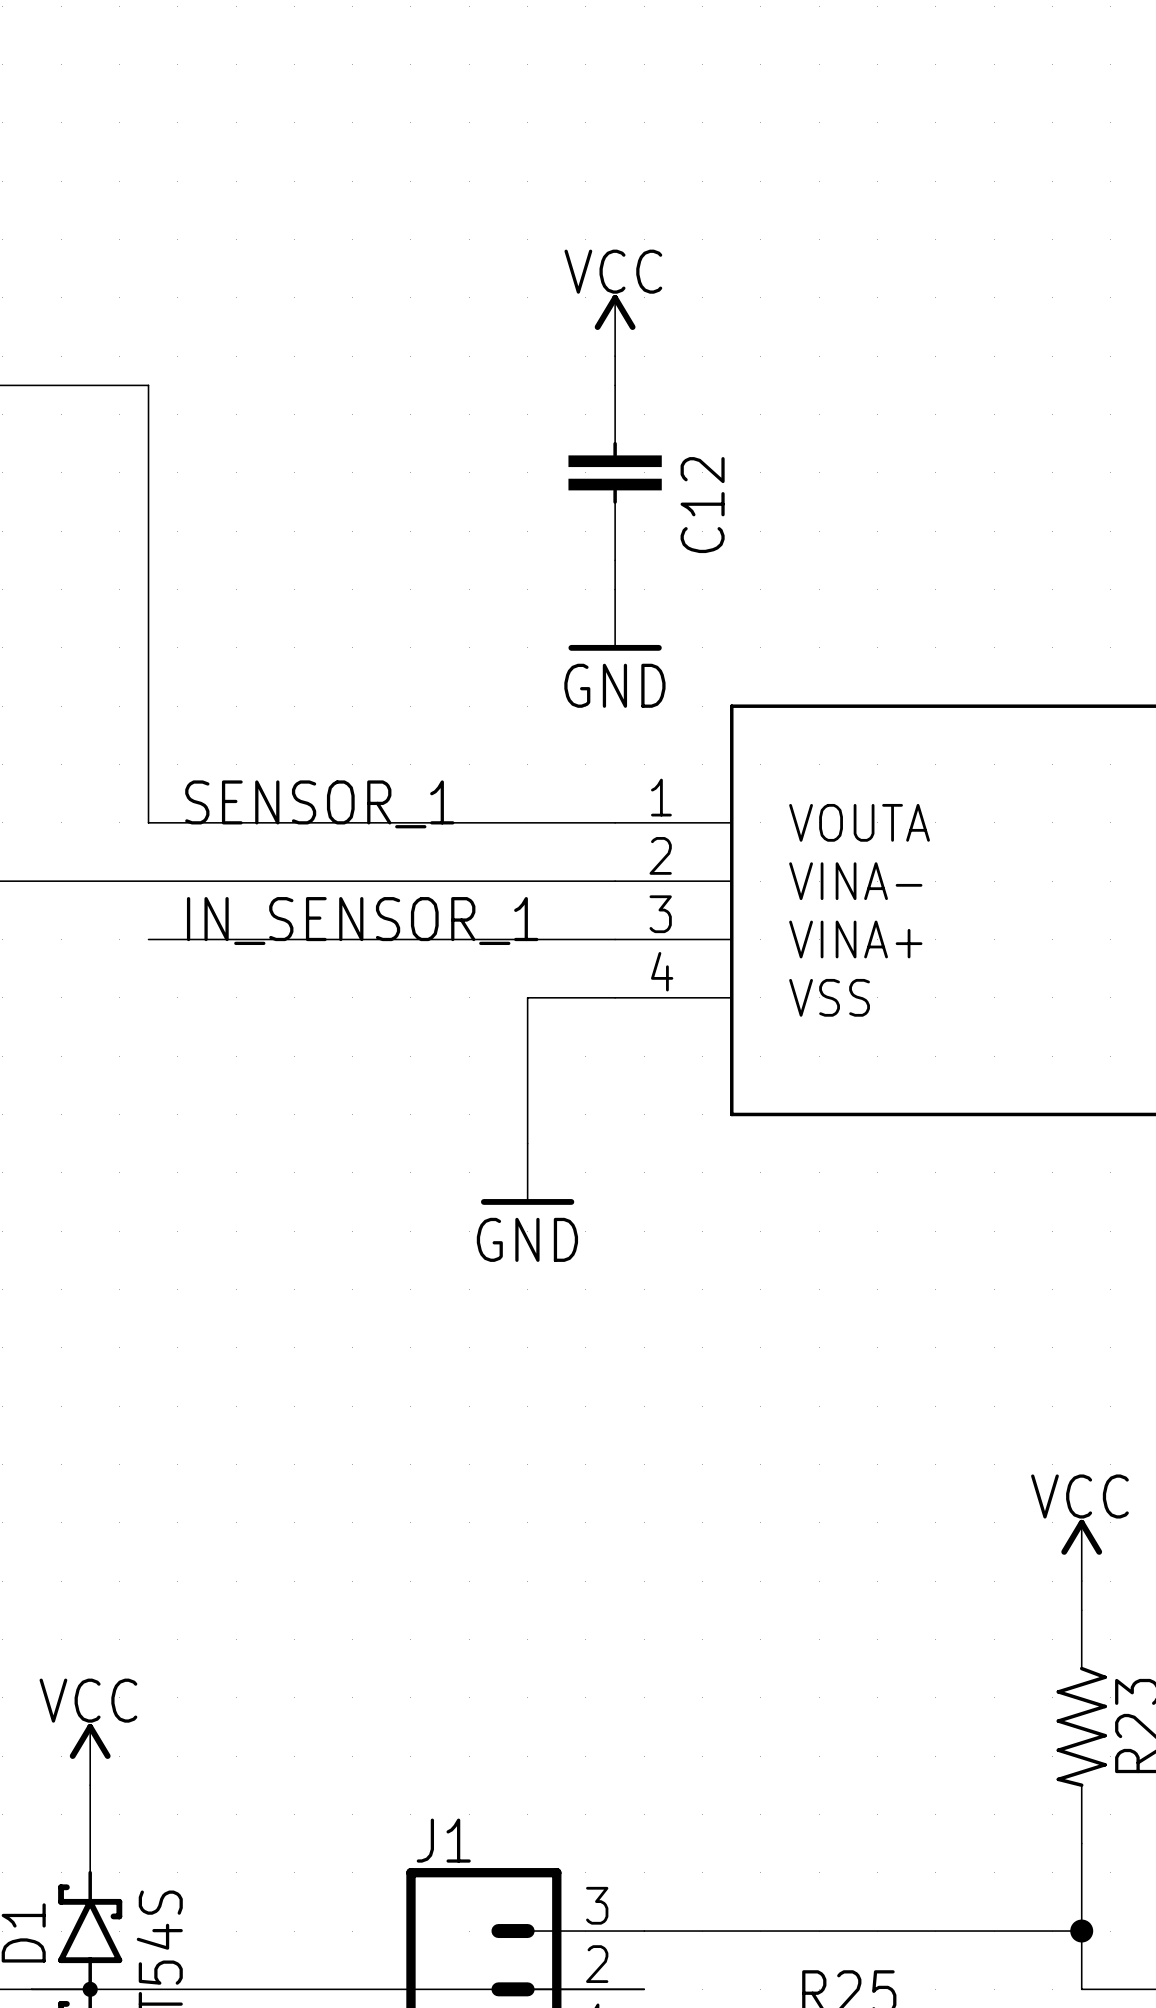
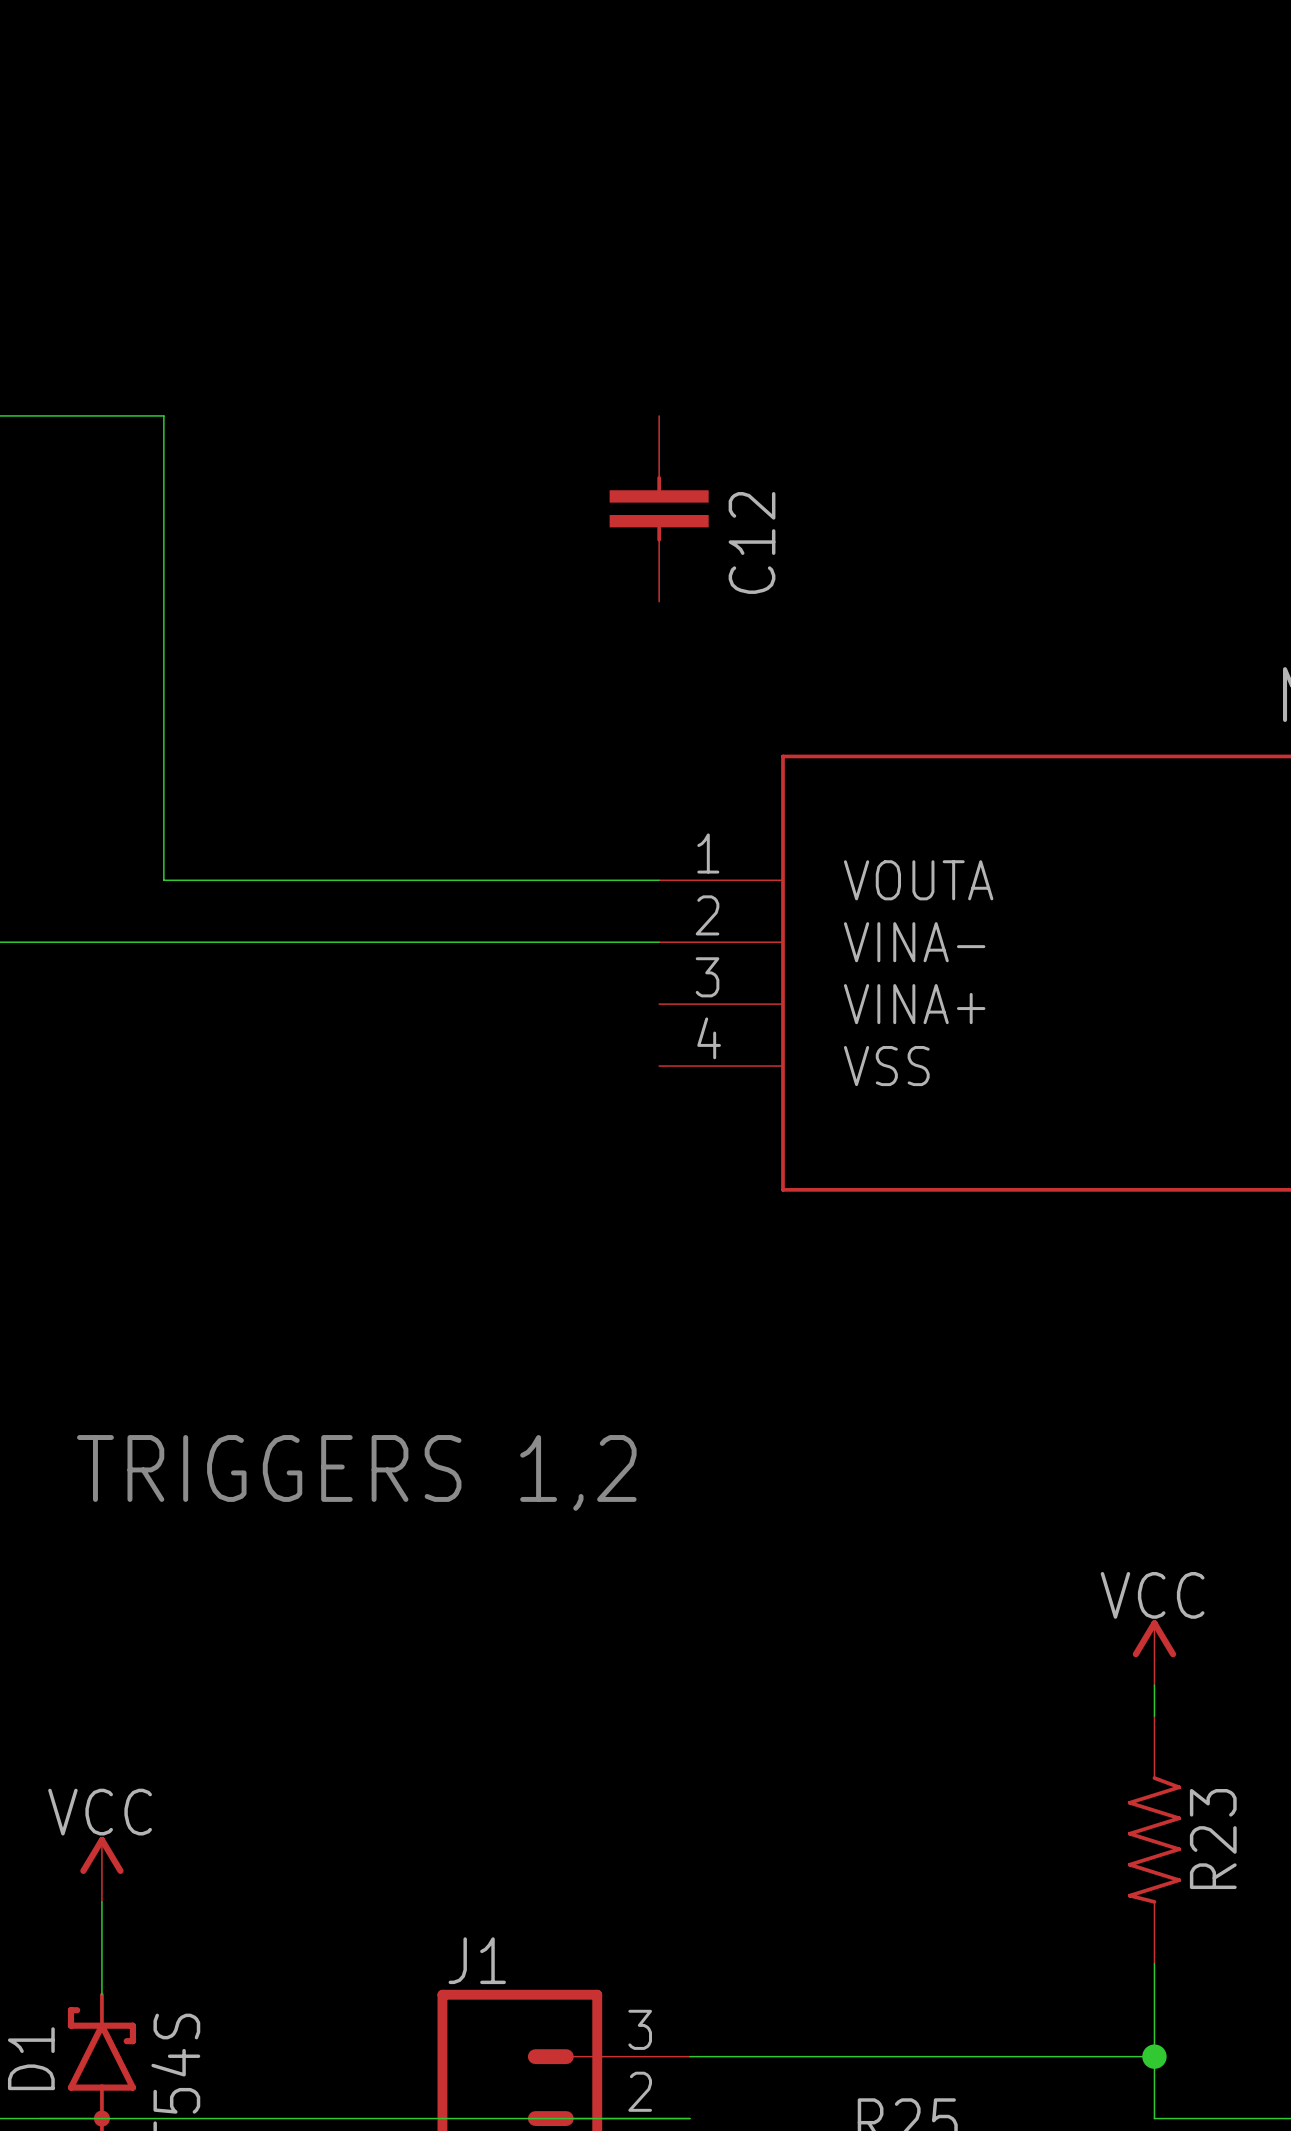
power symbol: VCC (615, 325) -> none
wire: (615, 356) (615, 385) -> none
wire: (615, 560) (615, 589) -> none
power symbol: GND (615, 620) -> none
label: SENSOR_1 (319, 804) -> none
label: IN_SENSOR_1 (362, 921) -> none
wire: (148, 939) (615, 939) -> none
wire: (615, 997) (527, 997) (527, 1143) -> none
power symbol: GND (527, 1174) -> none
text: none -> TRIGGERS 1,2 (356, 1472)

